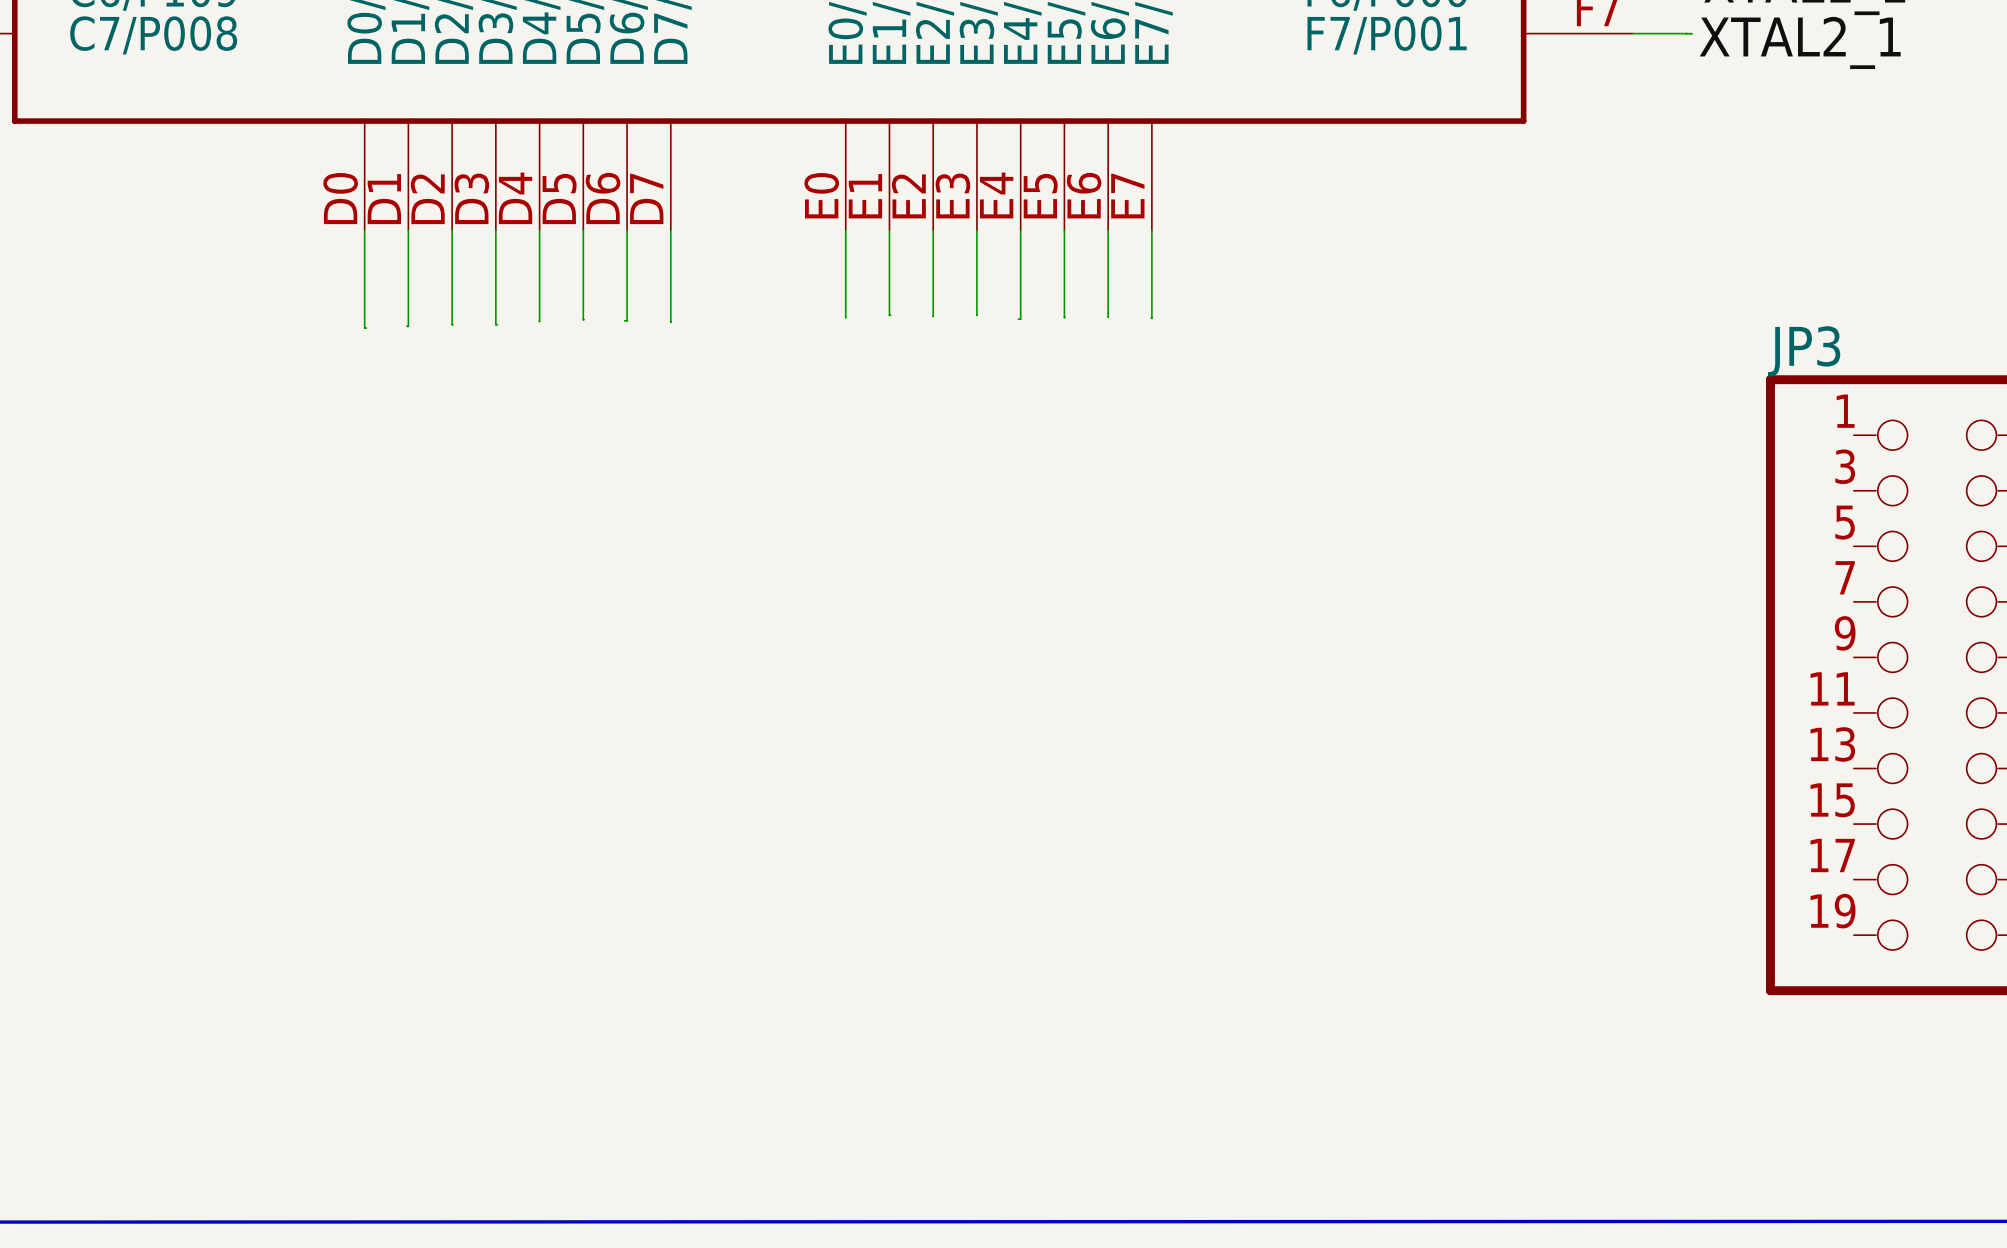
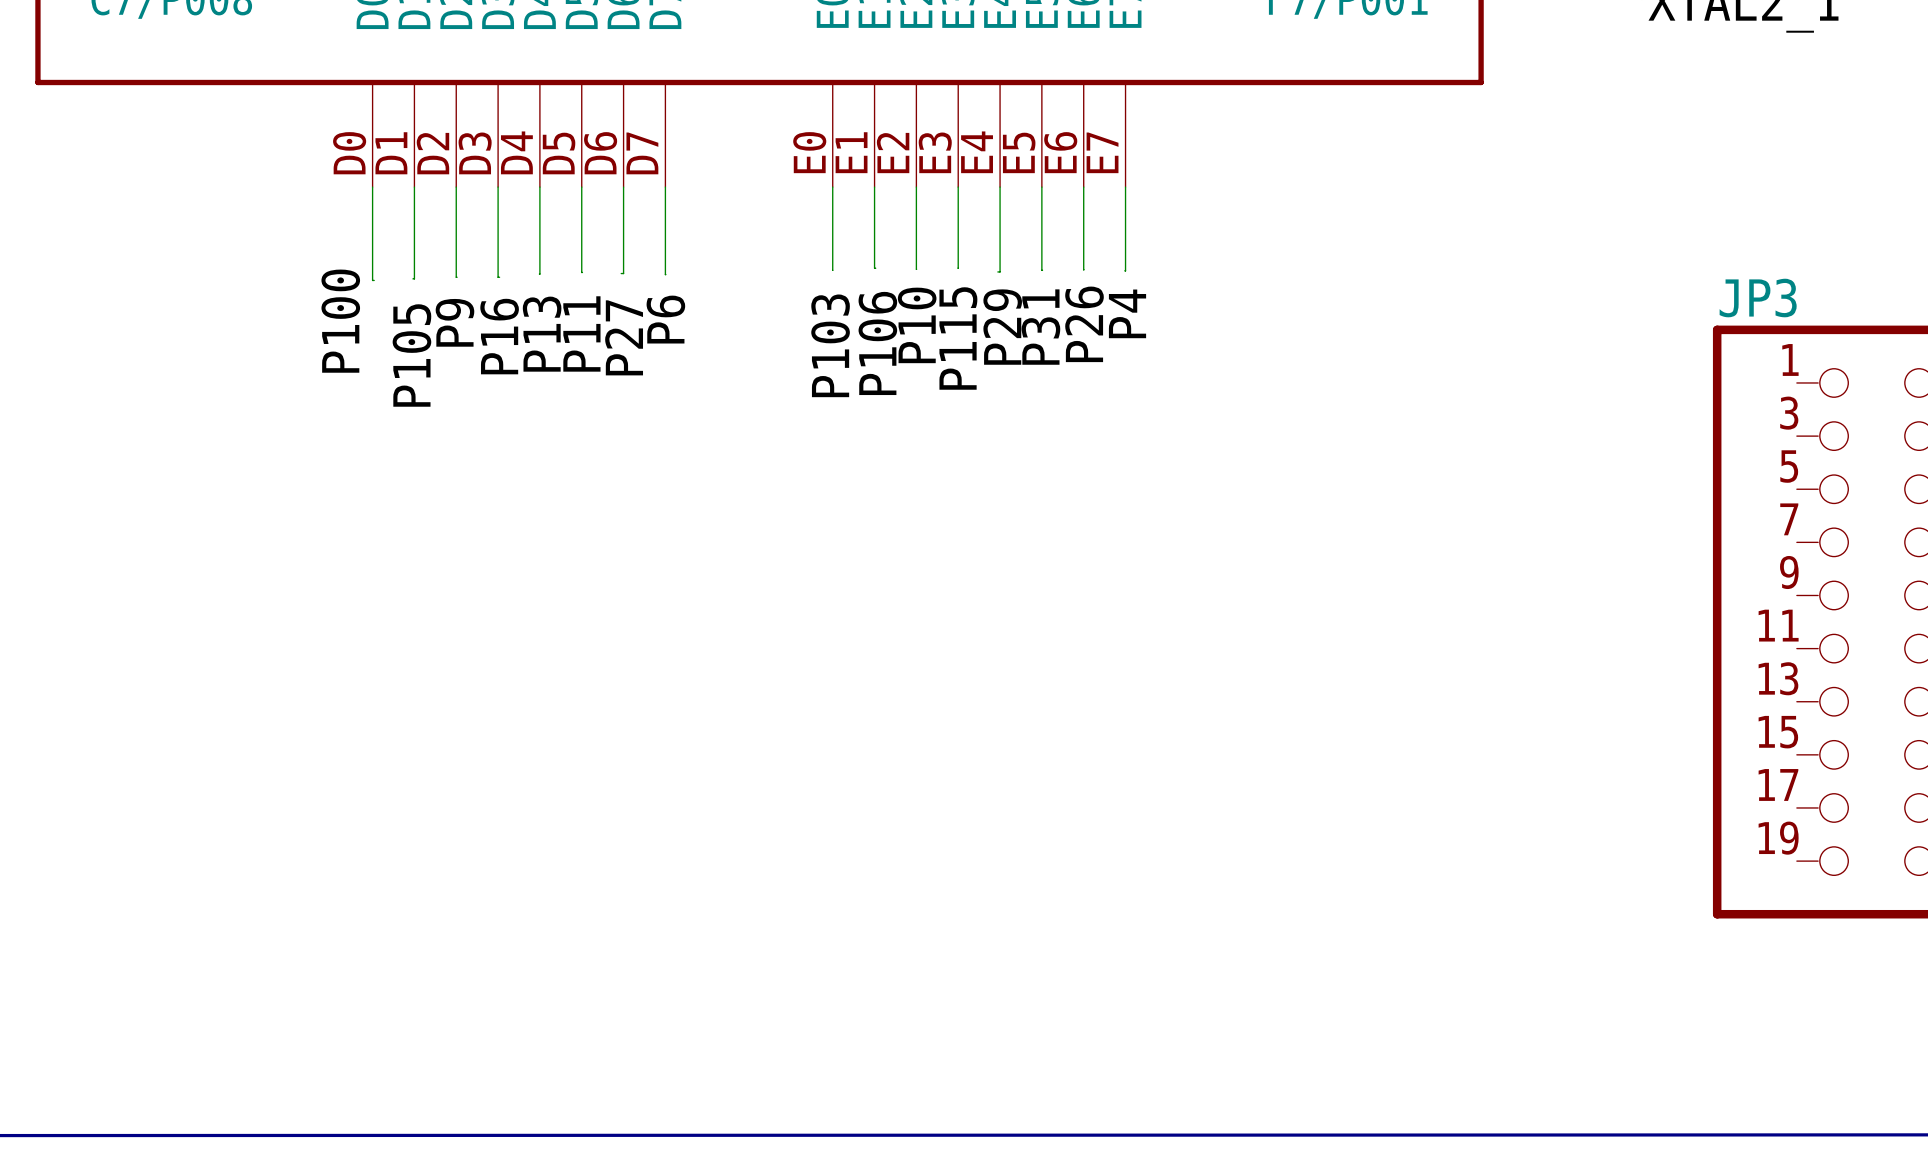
label: none -> P4 (1127, 313)
label: none -> P100 (340, 321)
label: none -> P6 (665, 319)
label: none -> P9 (454, 322)
label: none -> P26 (1084, 324)
label: none -> P10 (917, 325)
label: none -> P29 (1002, 327)
label: none -> P31 (1040, 327)
label: none -> P13 (542, 334)
label: none -> P11 (581, 333)
label: none -> P16 (499, 336)
label: none -> P27 (624, 337)
label: none -> P115 (958, 338)
label: none -> P106 (877, 343)
label: none -> P103 (830, 345)
label: none -> P105 (411, 355)

